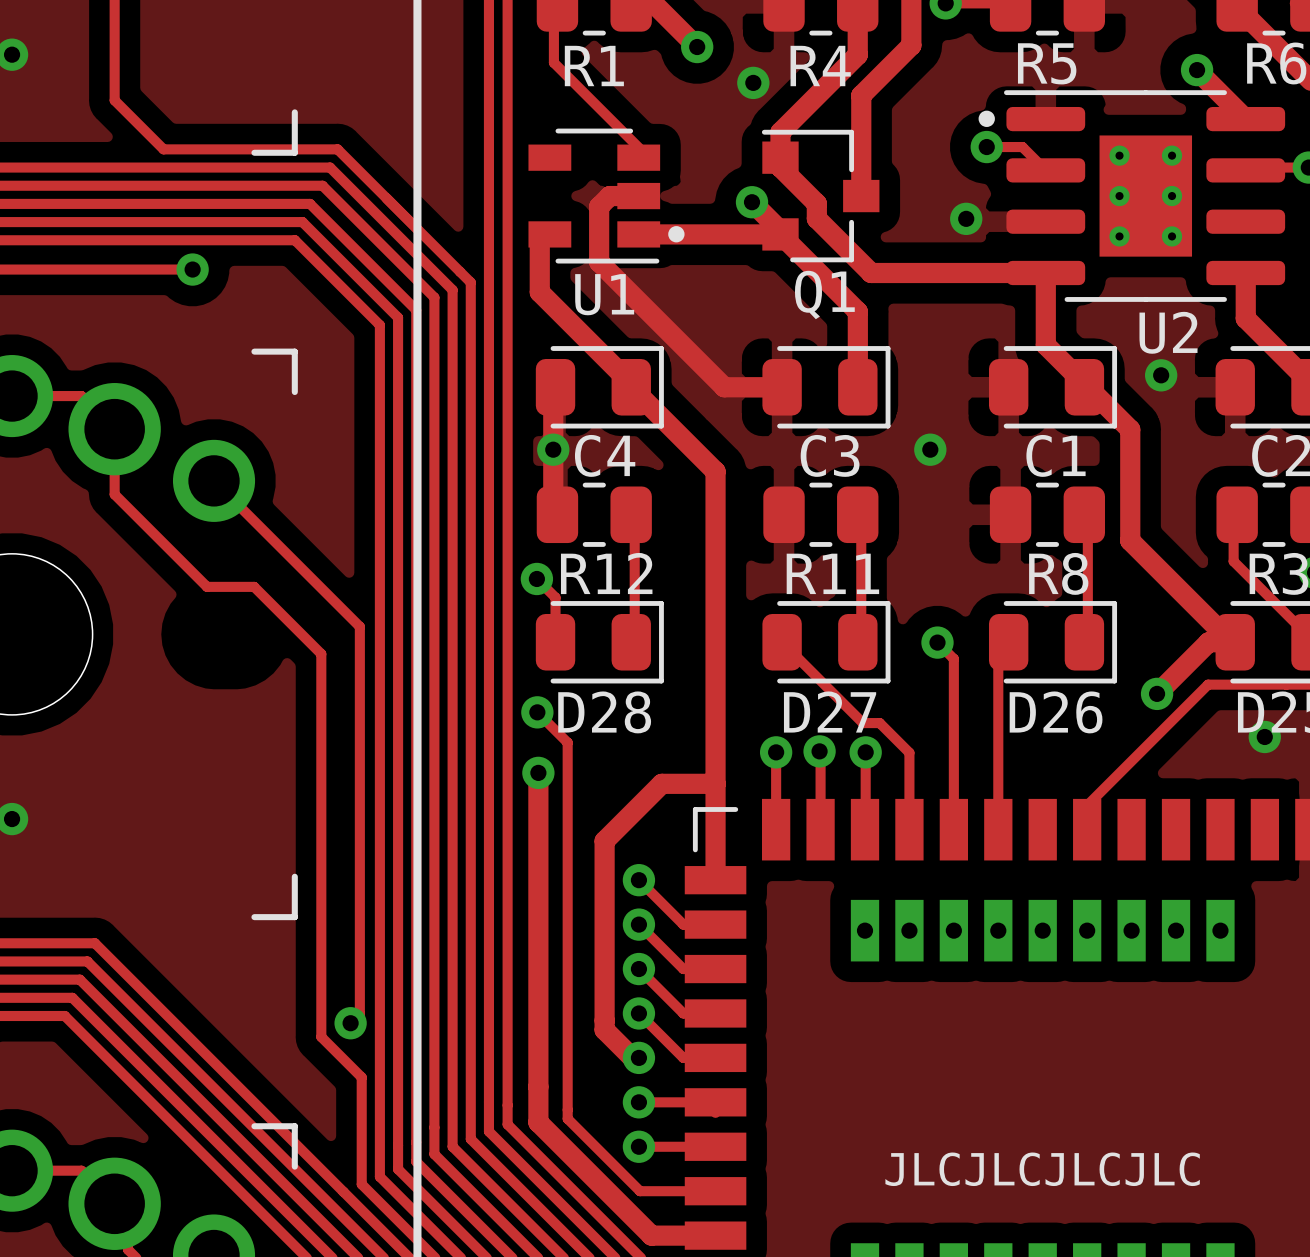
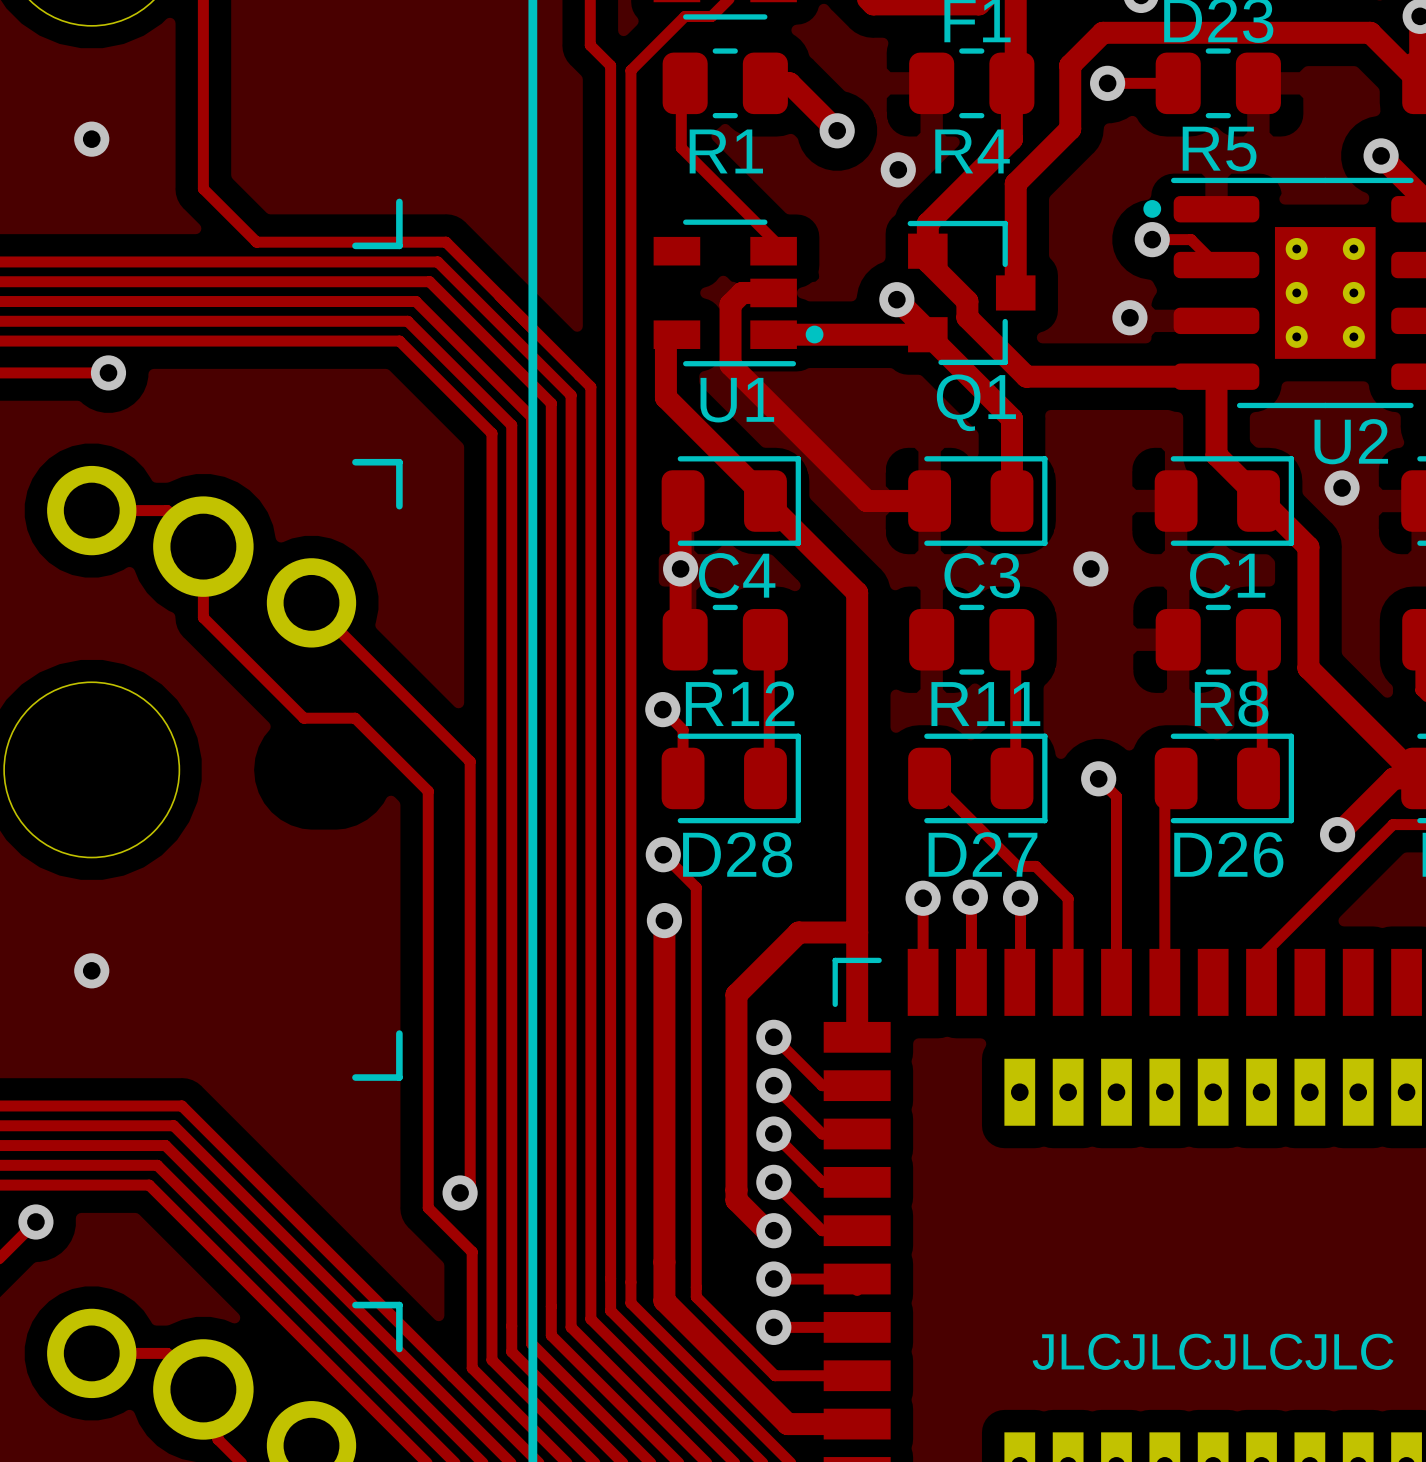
track: (27, 269) (192, 269) -> none
via position: (192, 269) -> (108, 372)

